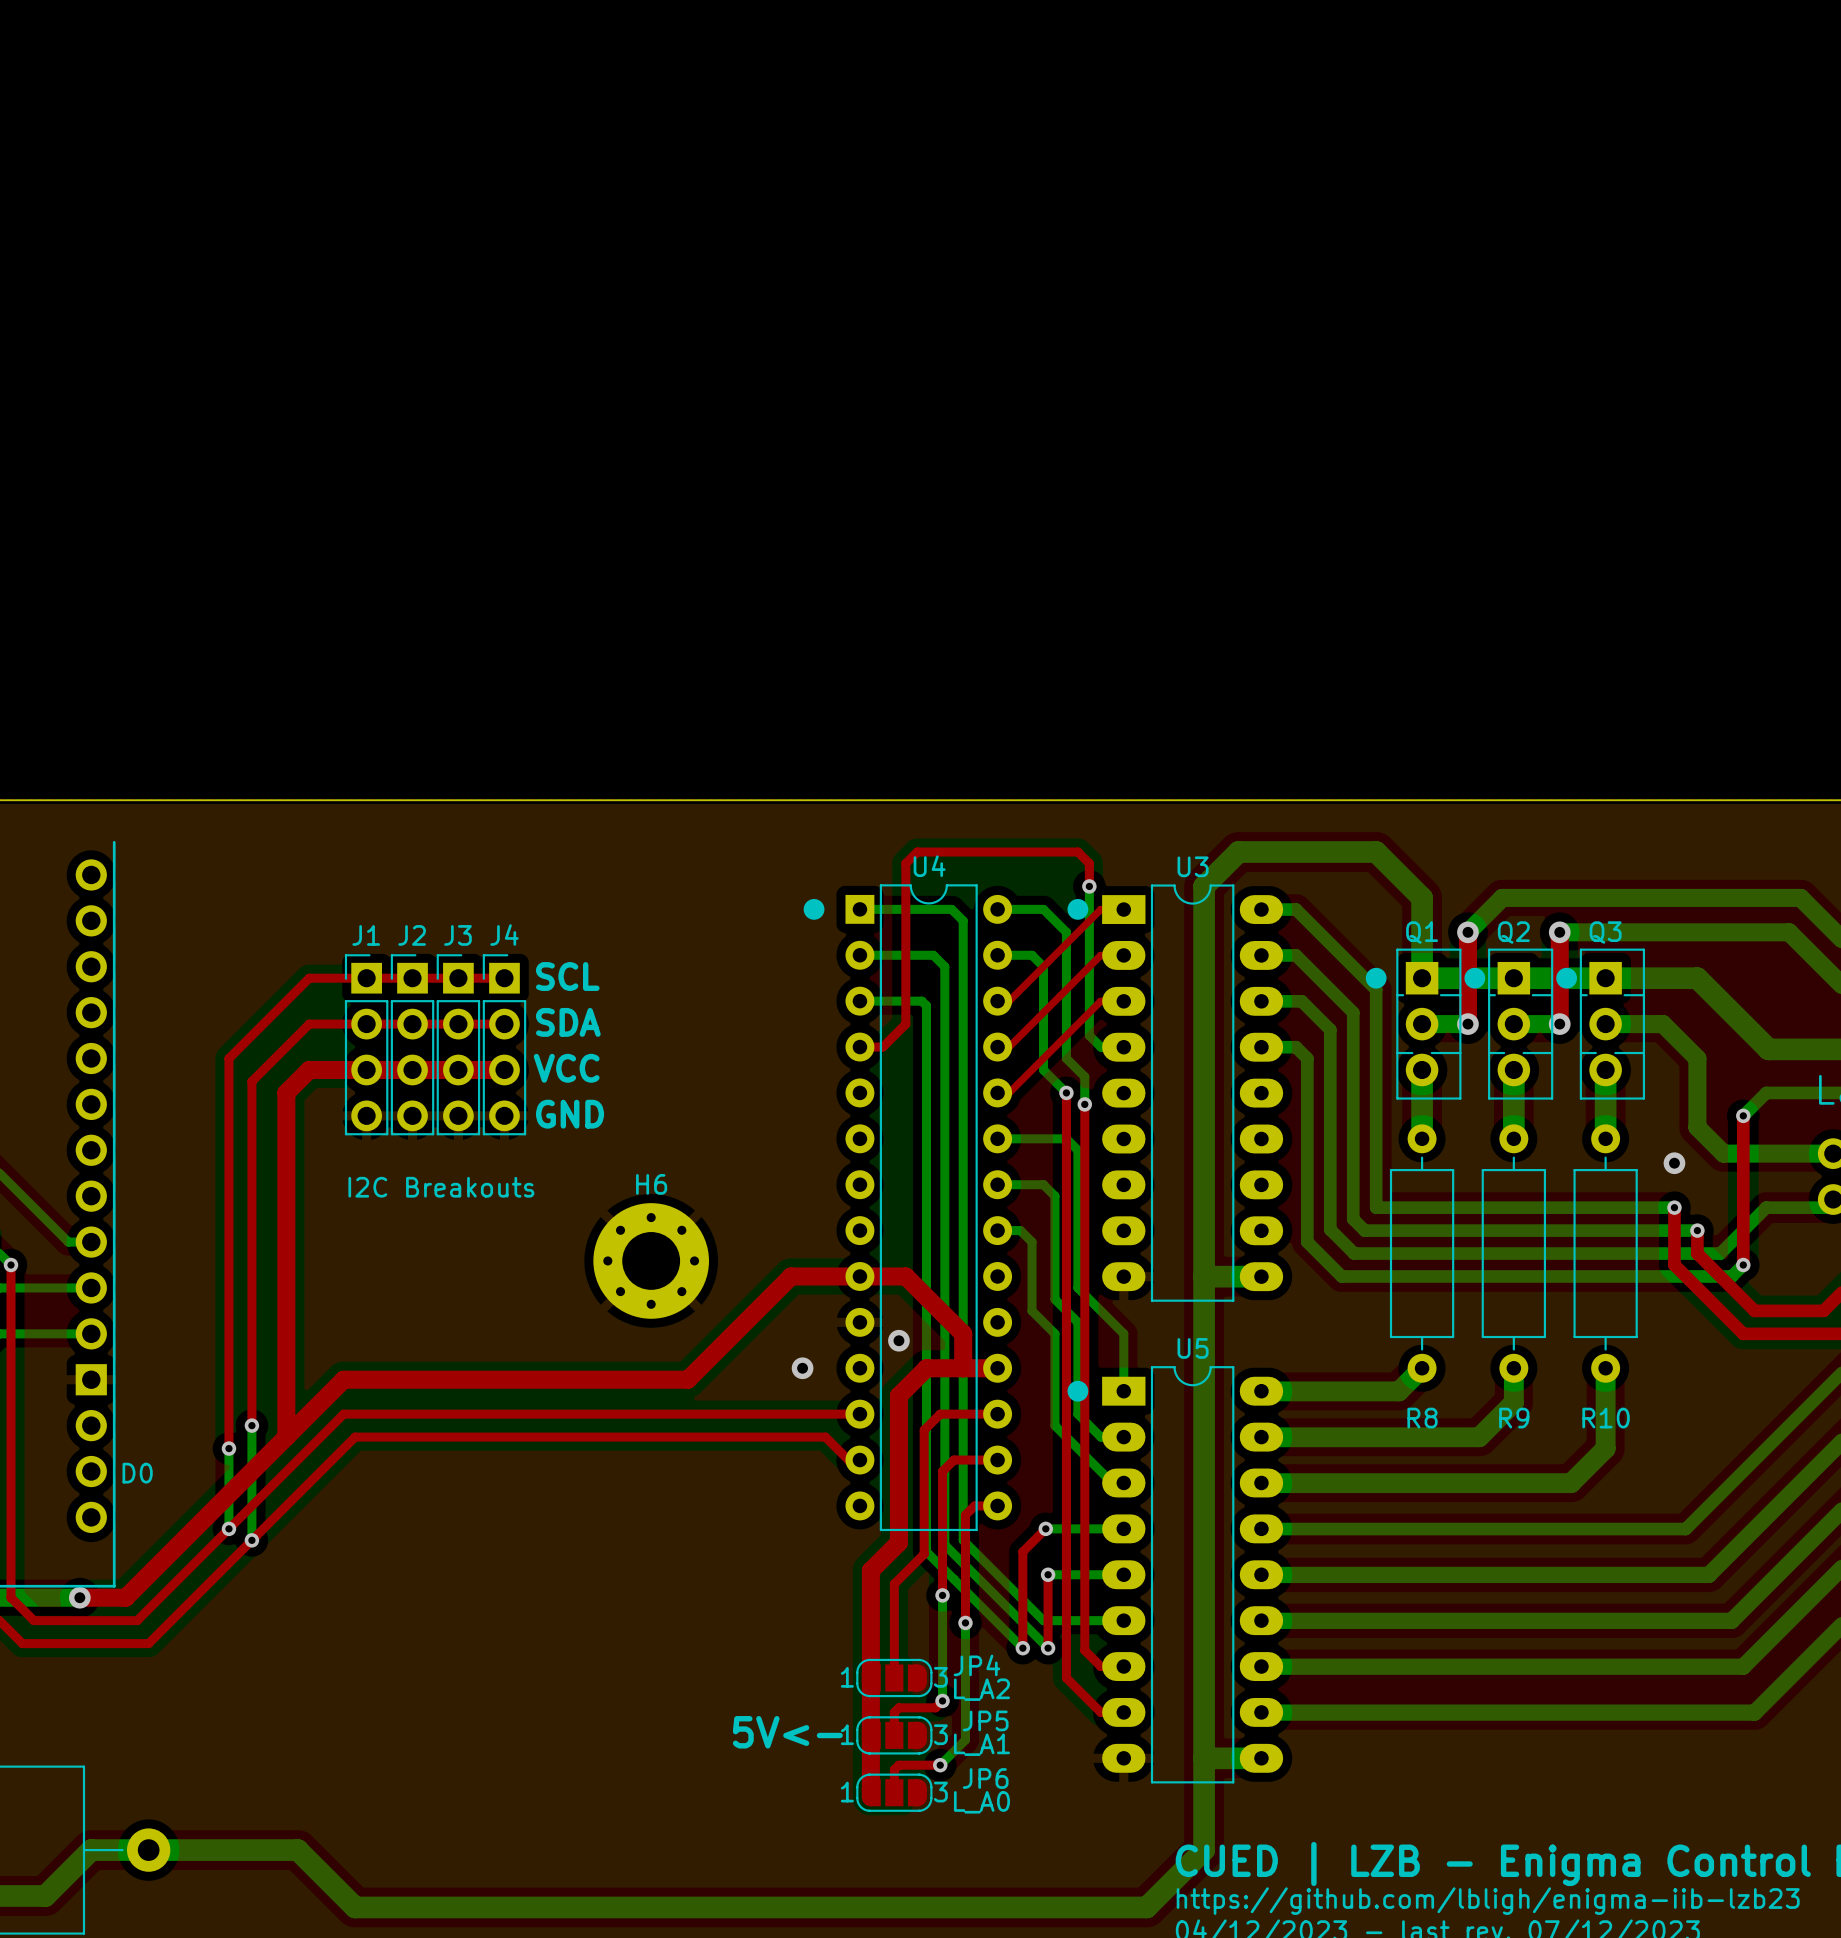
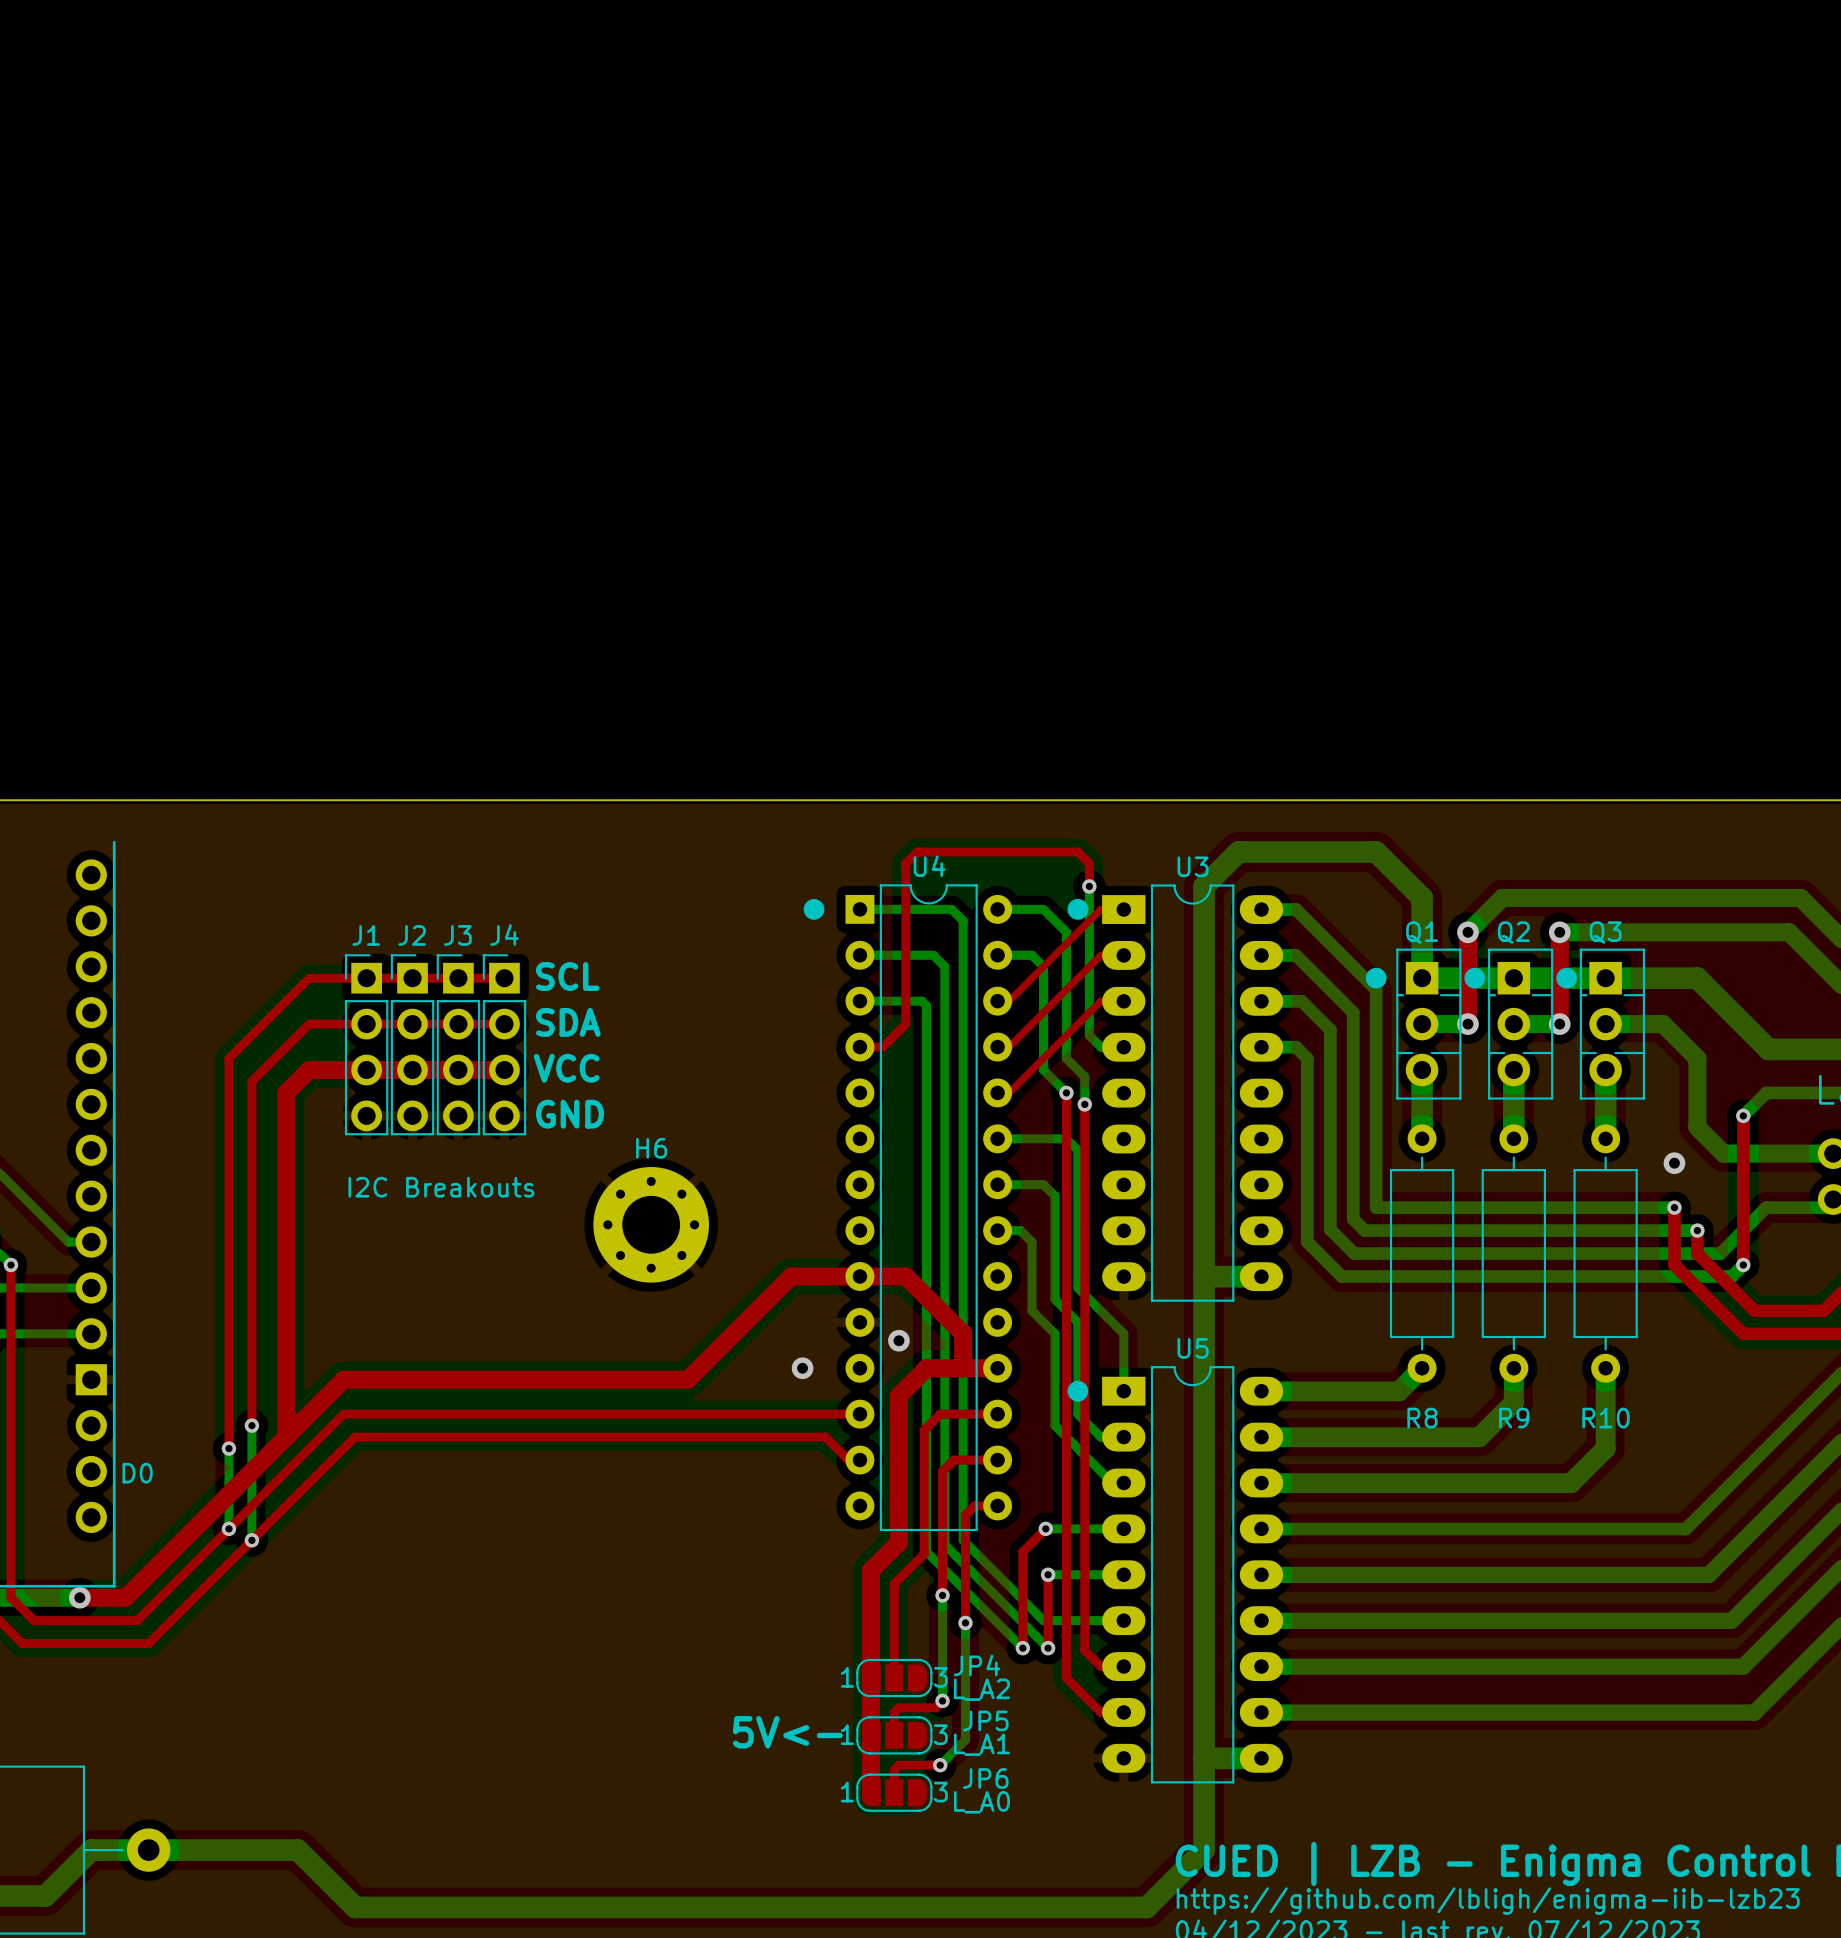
H6 position: (651, 1260) -> (651, 1224)

